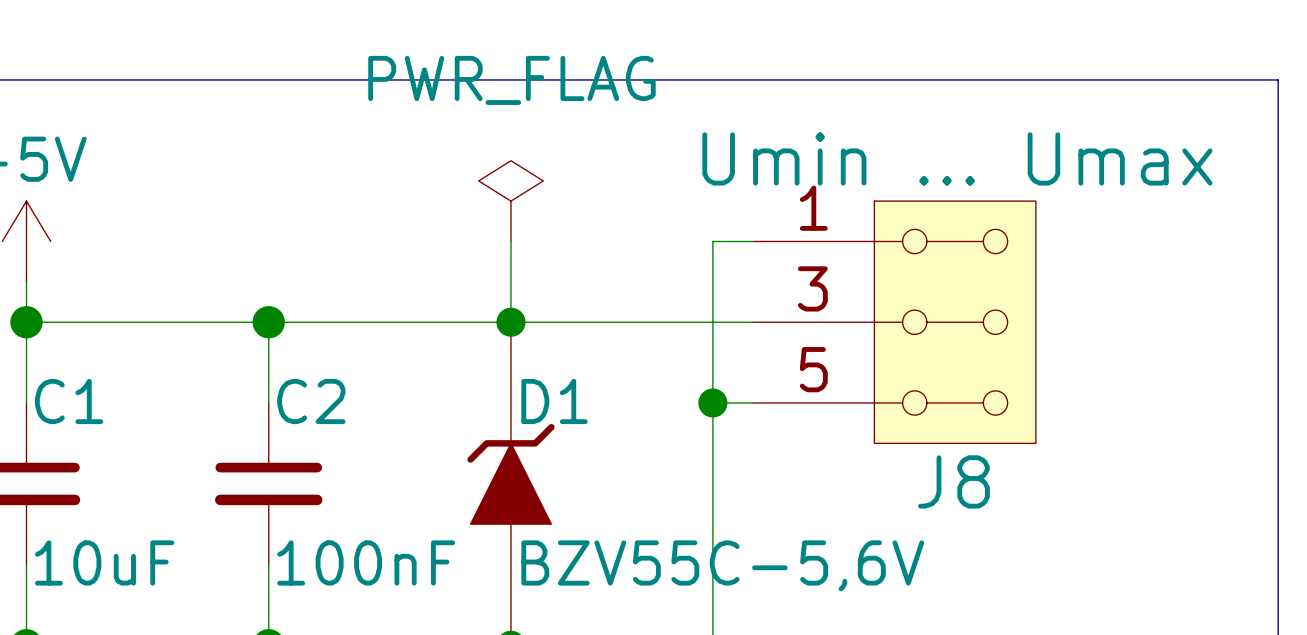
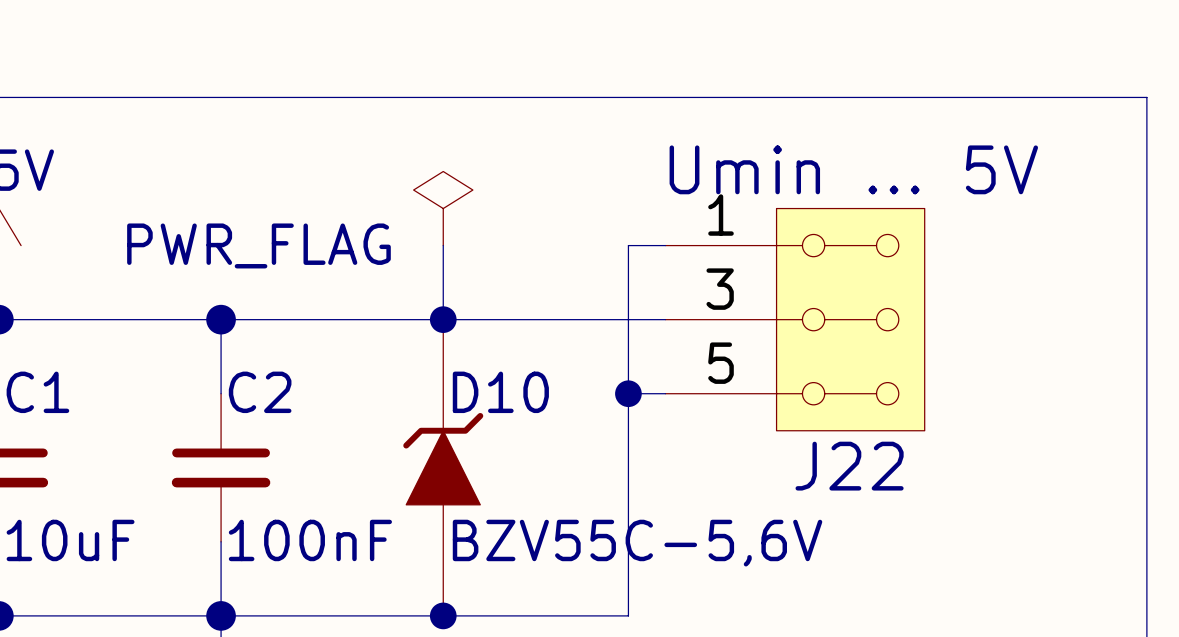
power symbol text position: PWR_FLAG (511, 80) -> PWR_FLAG (258, 245)
J8 value: Umin ... Umax (957, 158) -> Umin ... 5V (853, 169)
D1 name: D1 (554, 401) -> D10 (500, 392)
J8 name: J8 (953, 481) -> J22 (849, 466)

